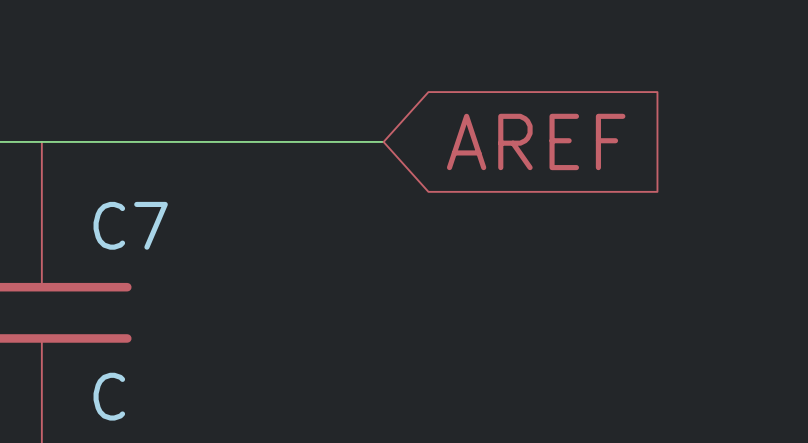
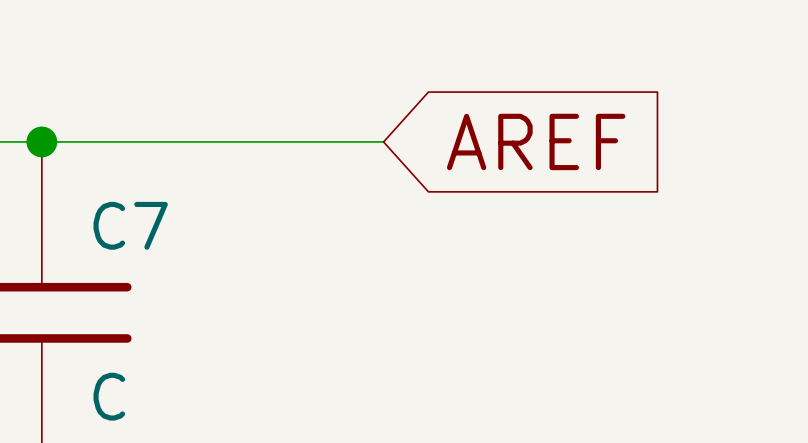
junction: none -> (41, 141)

